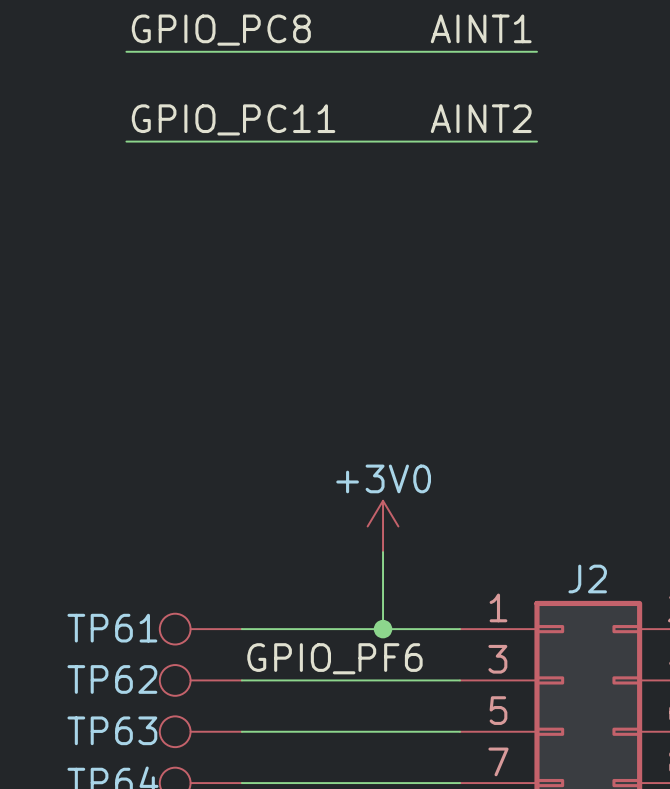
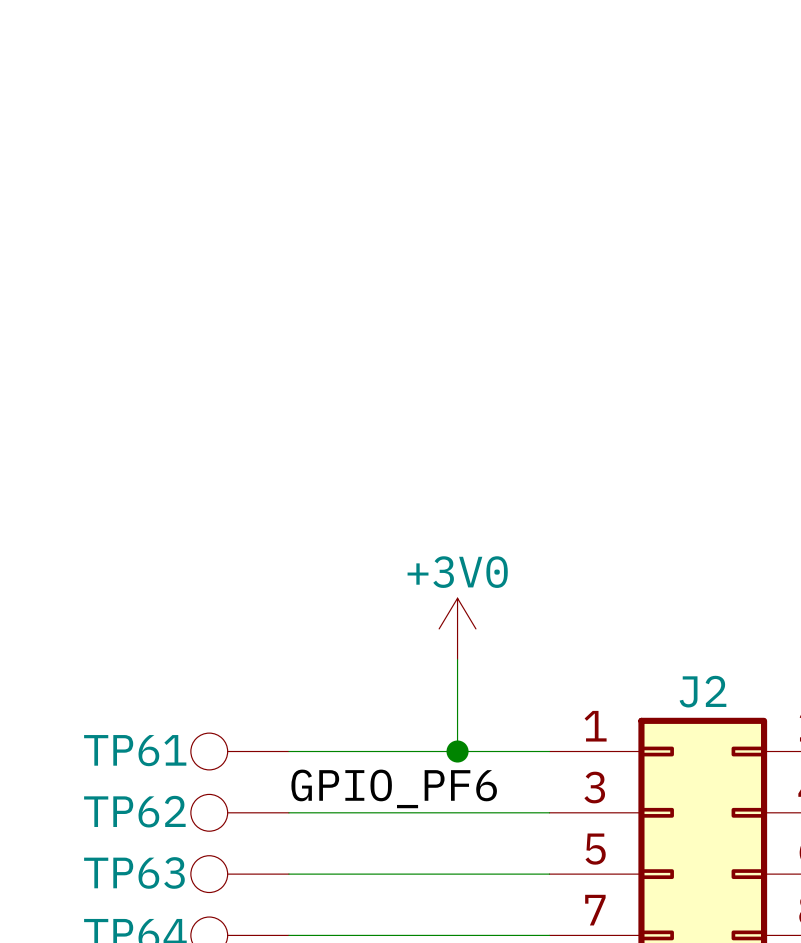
label: AINT1 (481, 28) -> none
label: GPIO_PC8 (221, 30) -> none
wire: (126, 51) (536, 51) -> none
label: AINT2 (481, 118) -> none
label: GPIO_PC11 (233, 119) -> none
wire: (126, 141) (536, 141) -> none

